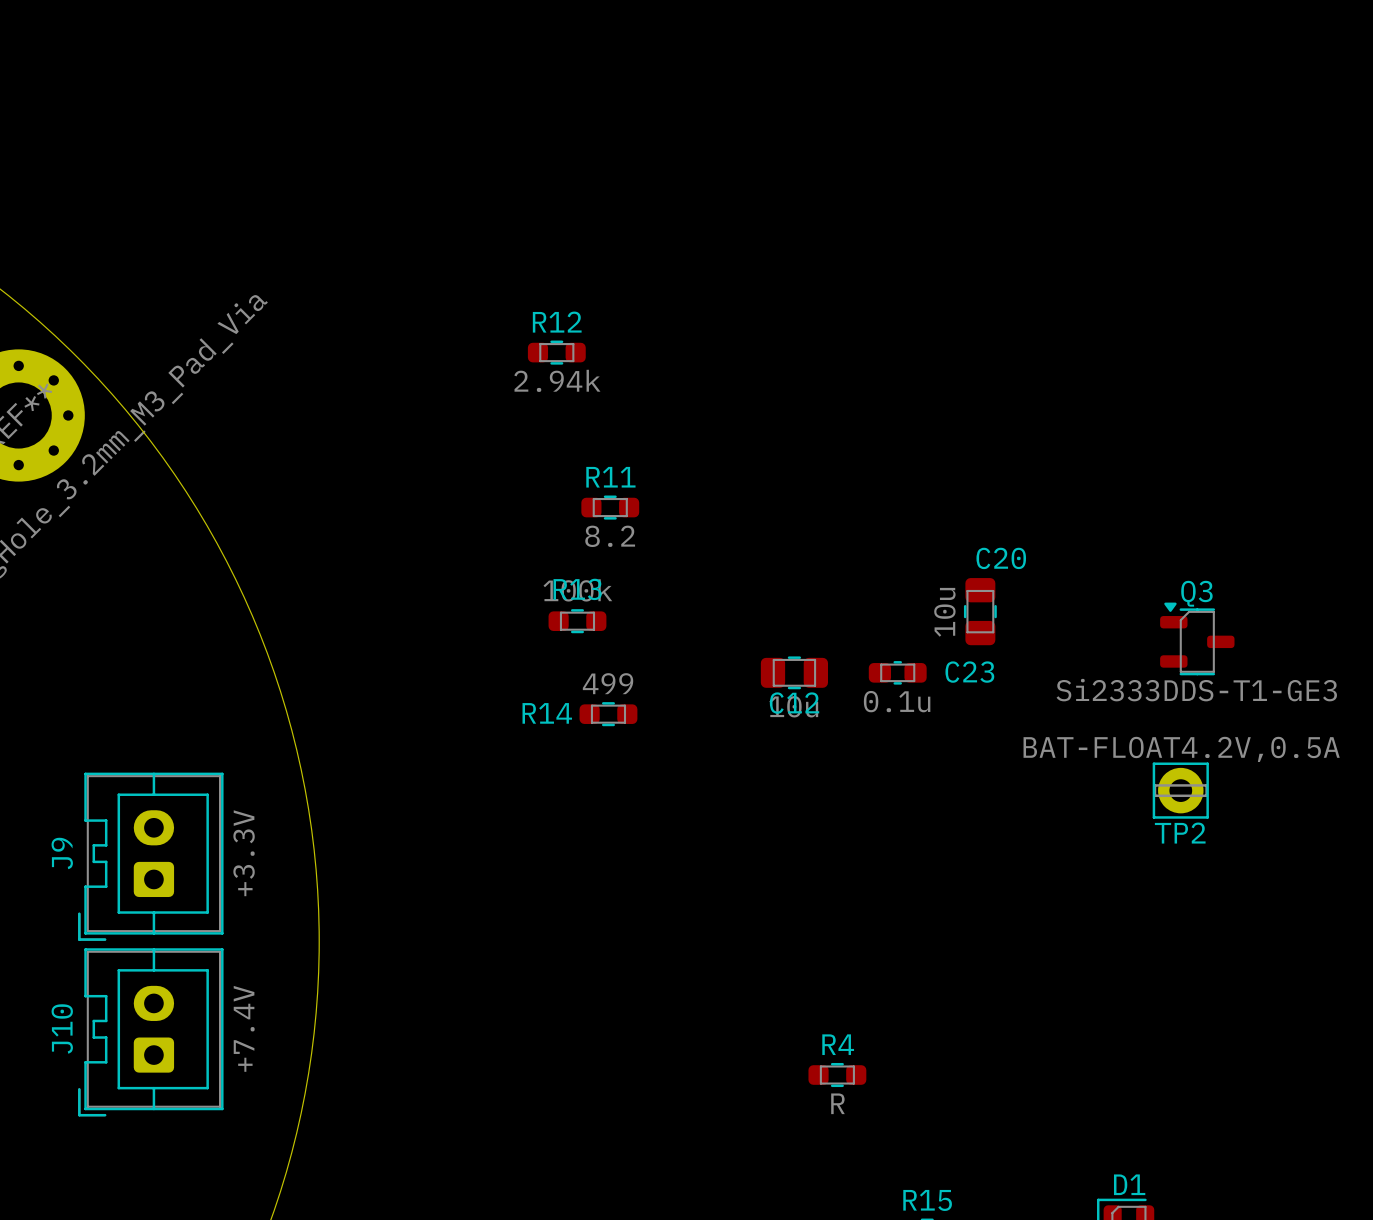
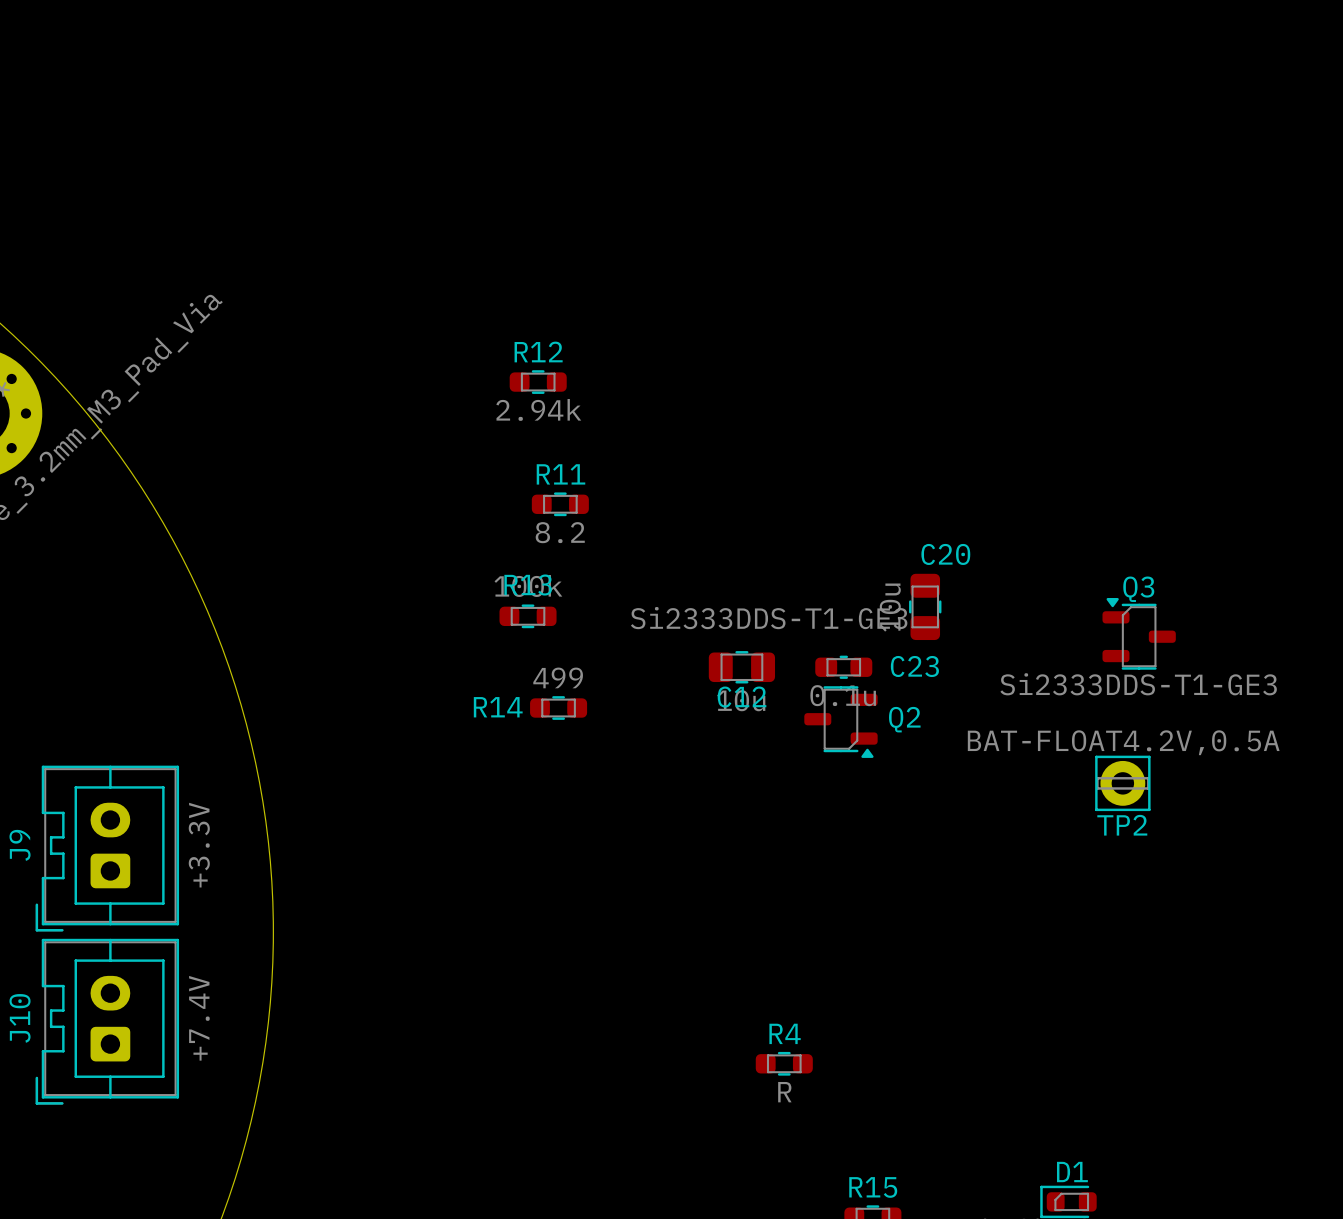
R12 position: (556, 352) -> (538, 382)
Q2: none -> Si2333DDS-T1-GE3 (840, 722)

